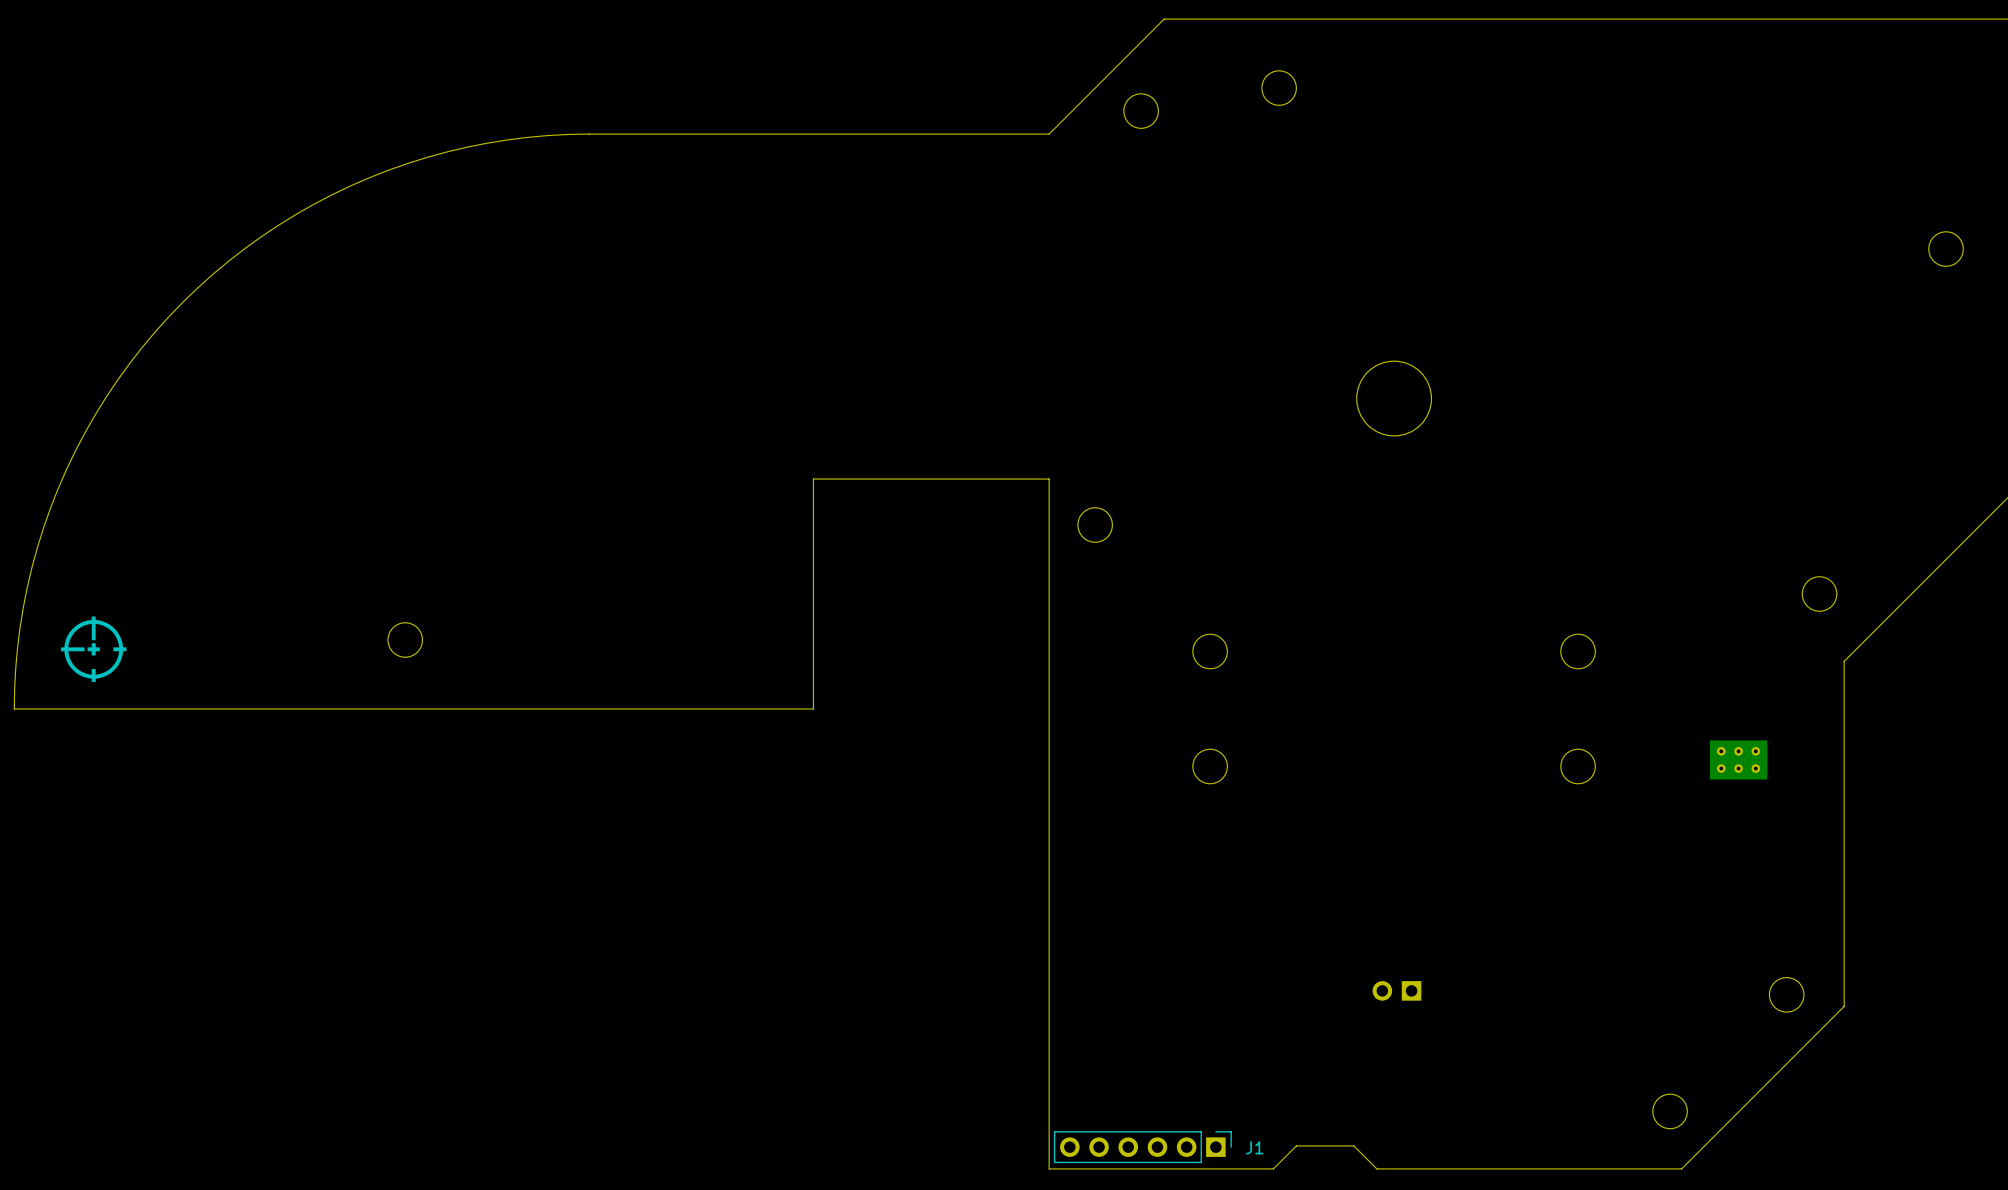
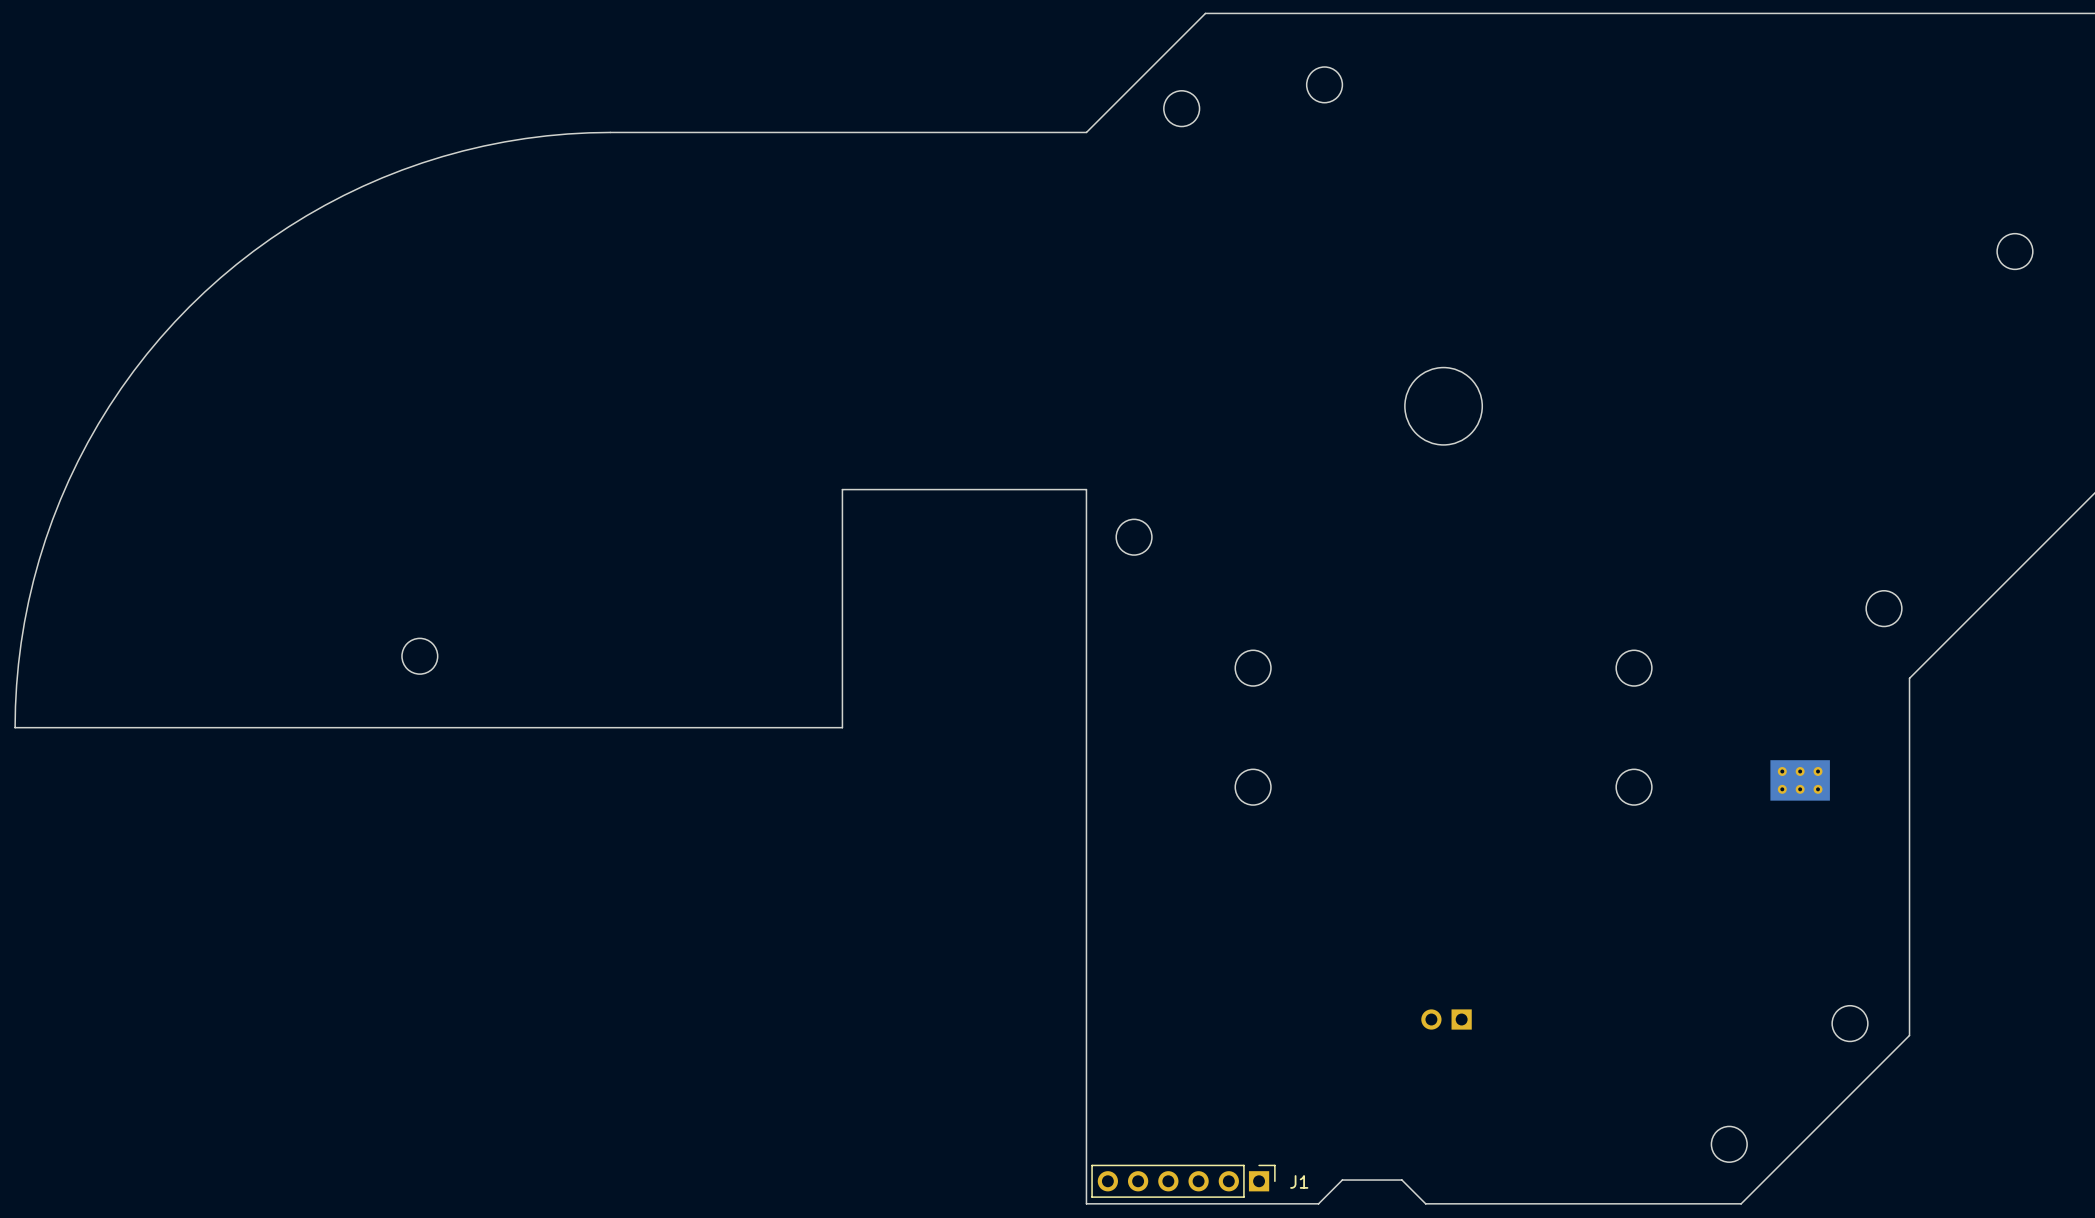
drawing: [60, 616, 127, 683] -> none

